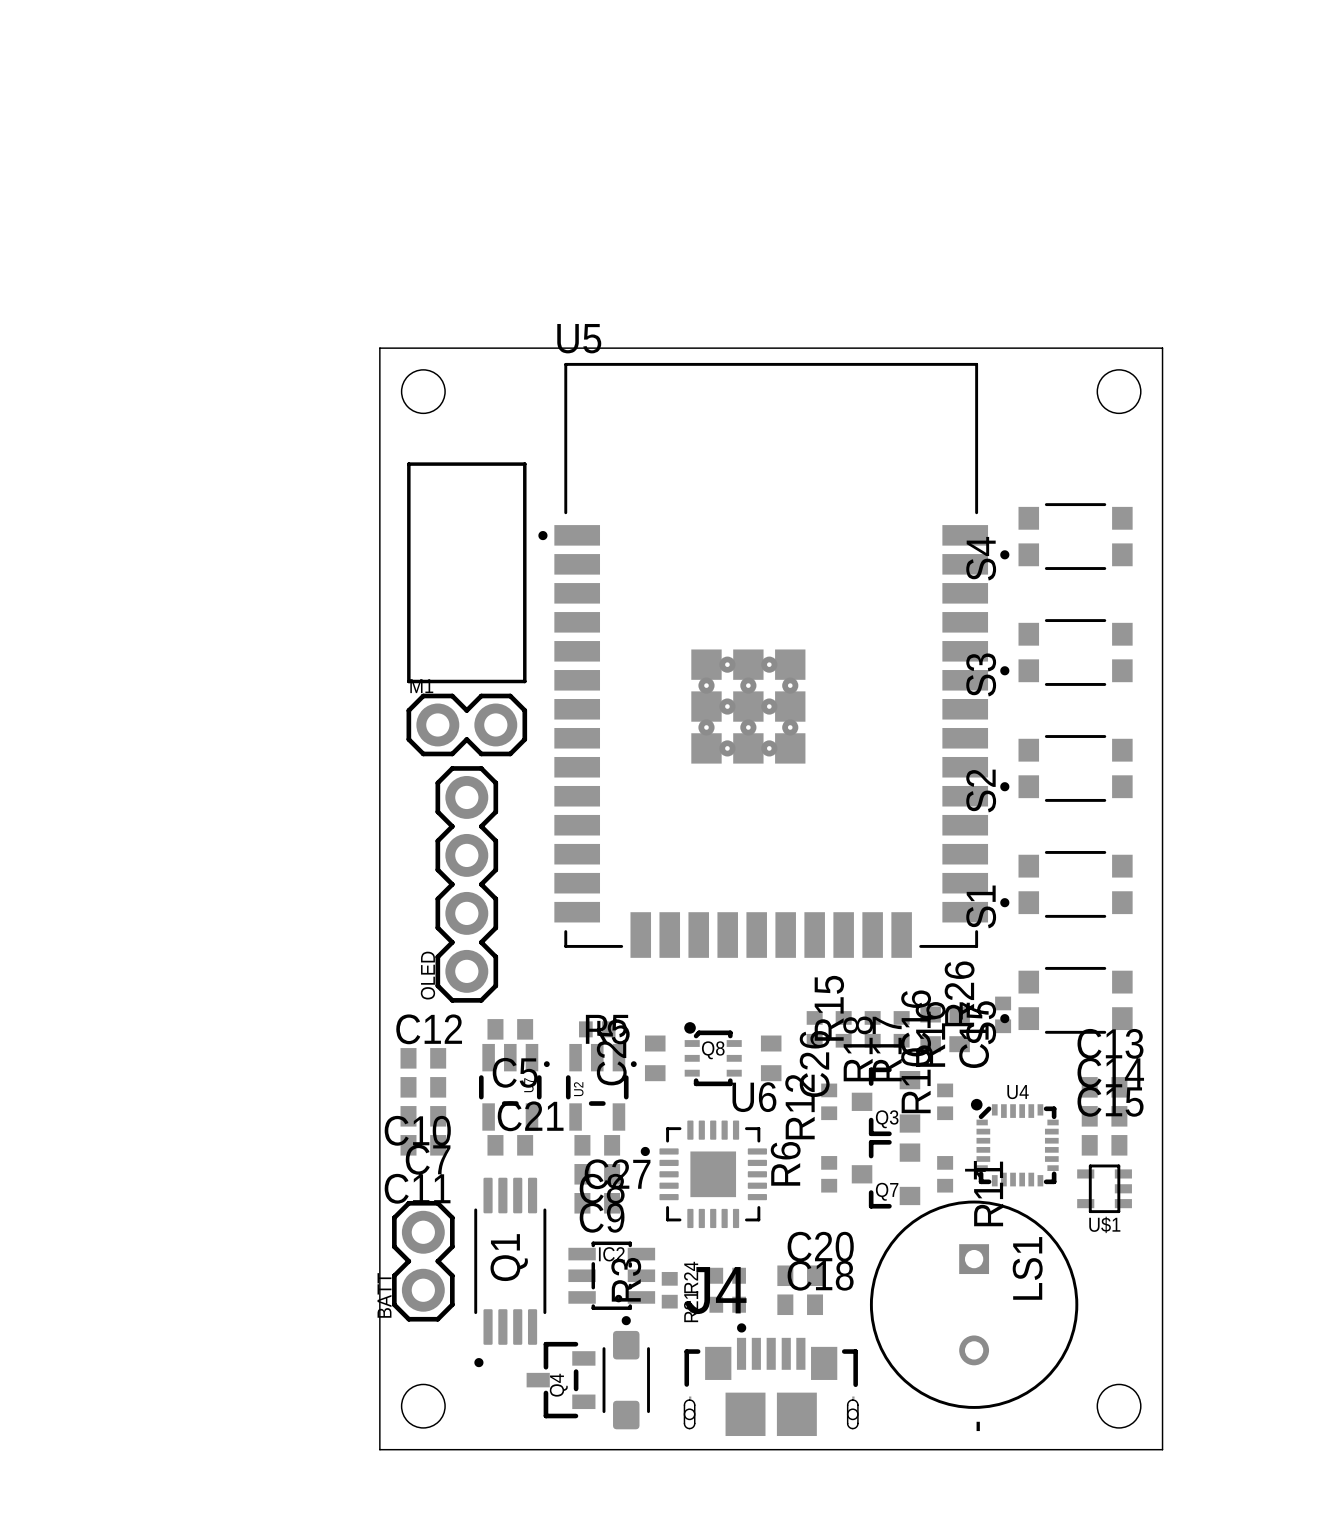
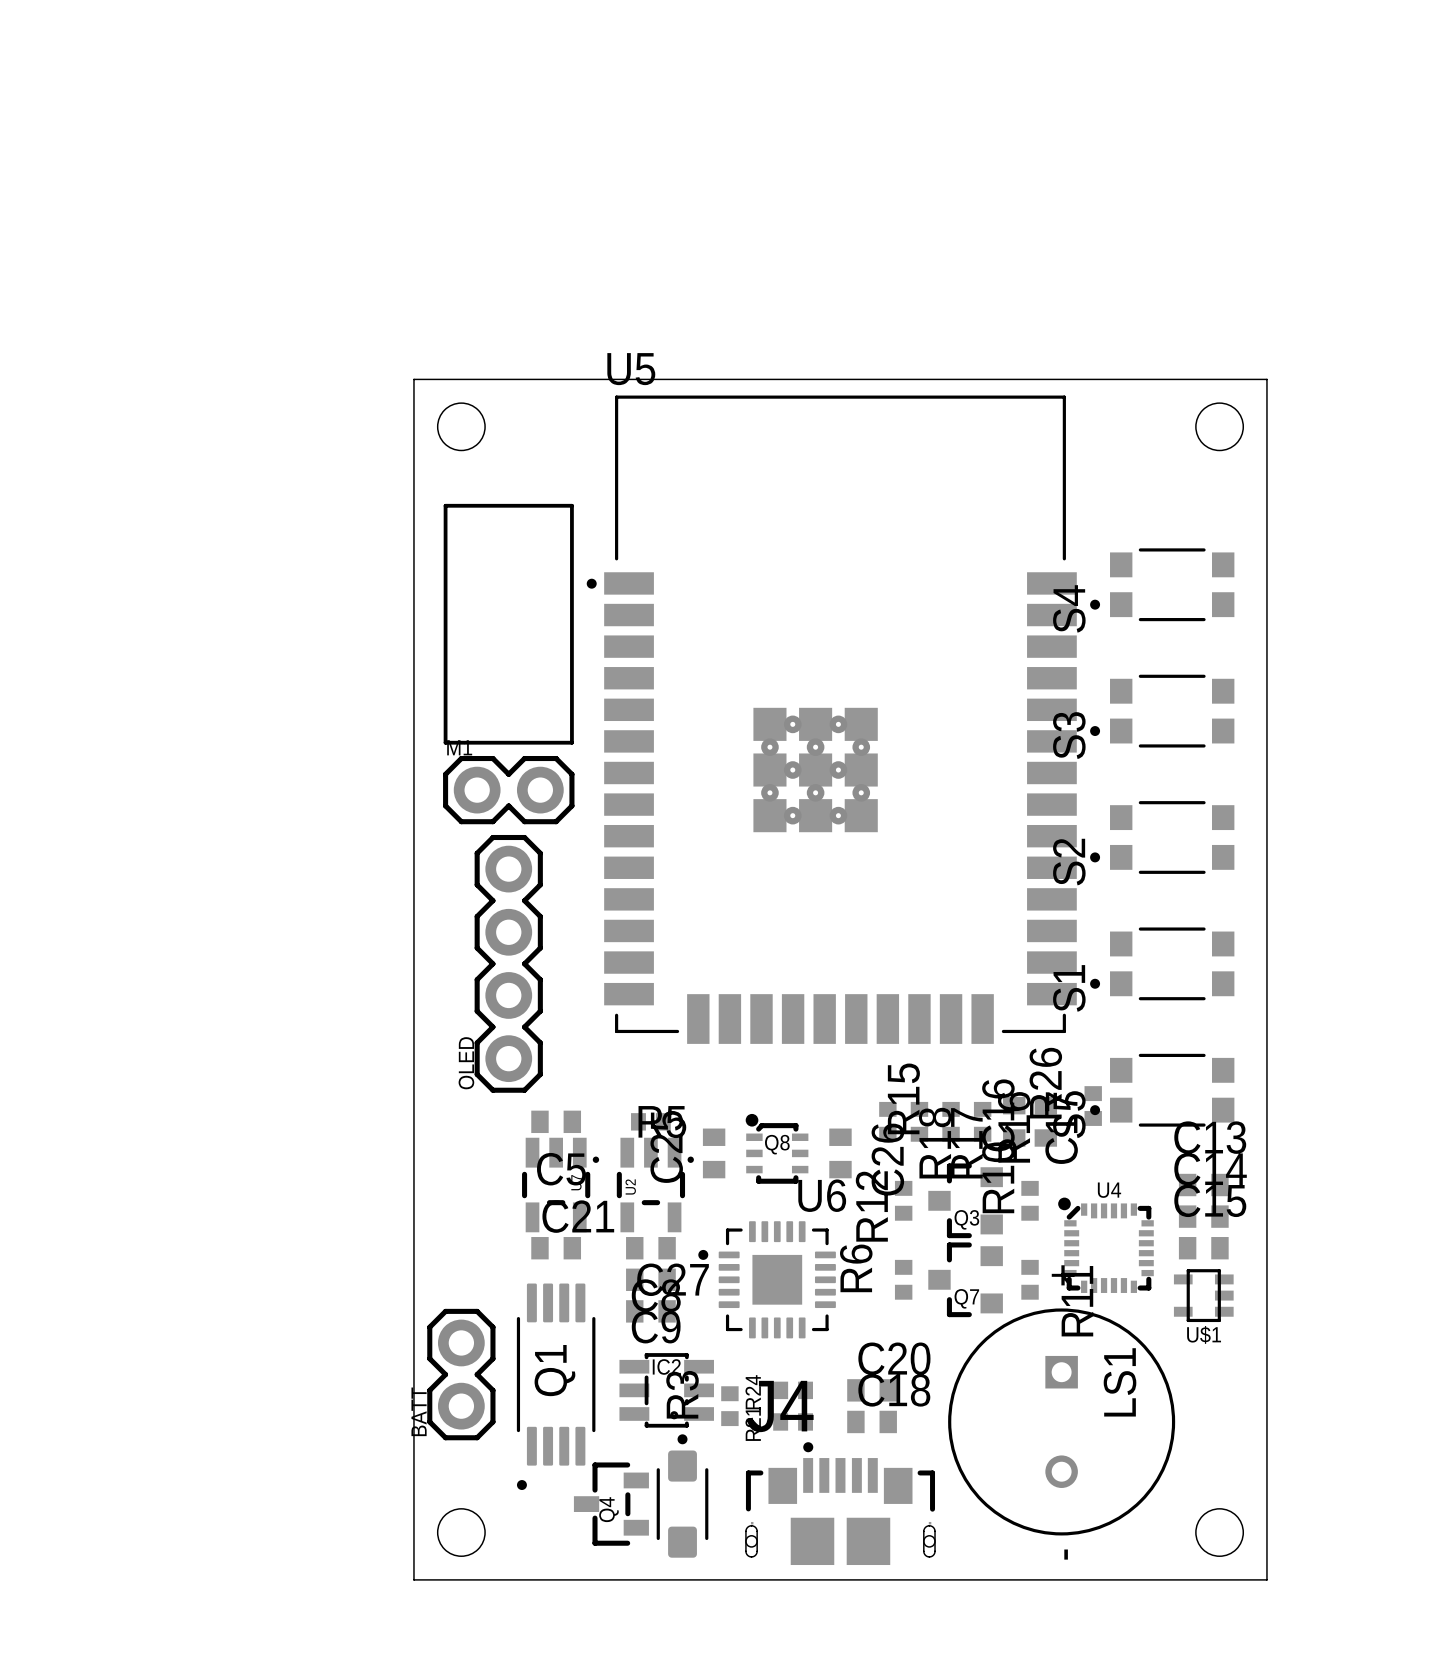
C12: (423, 1058) -> none
C10: (423, 1087) -> none
C7: (423, 1116) -> none
C11: (423, 1145) -> none

